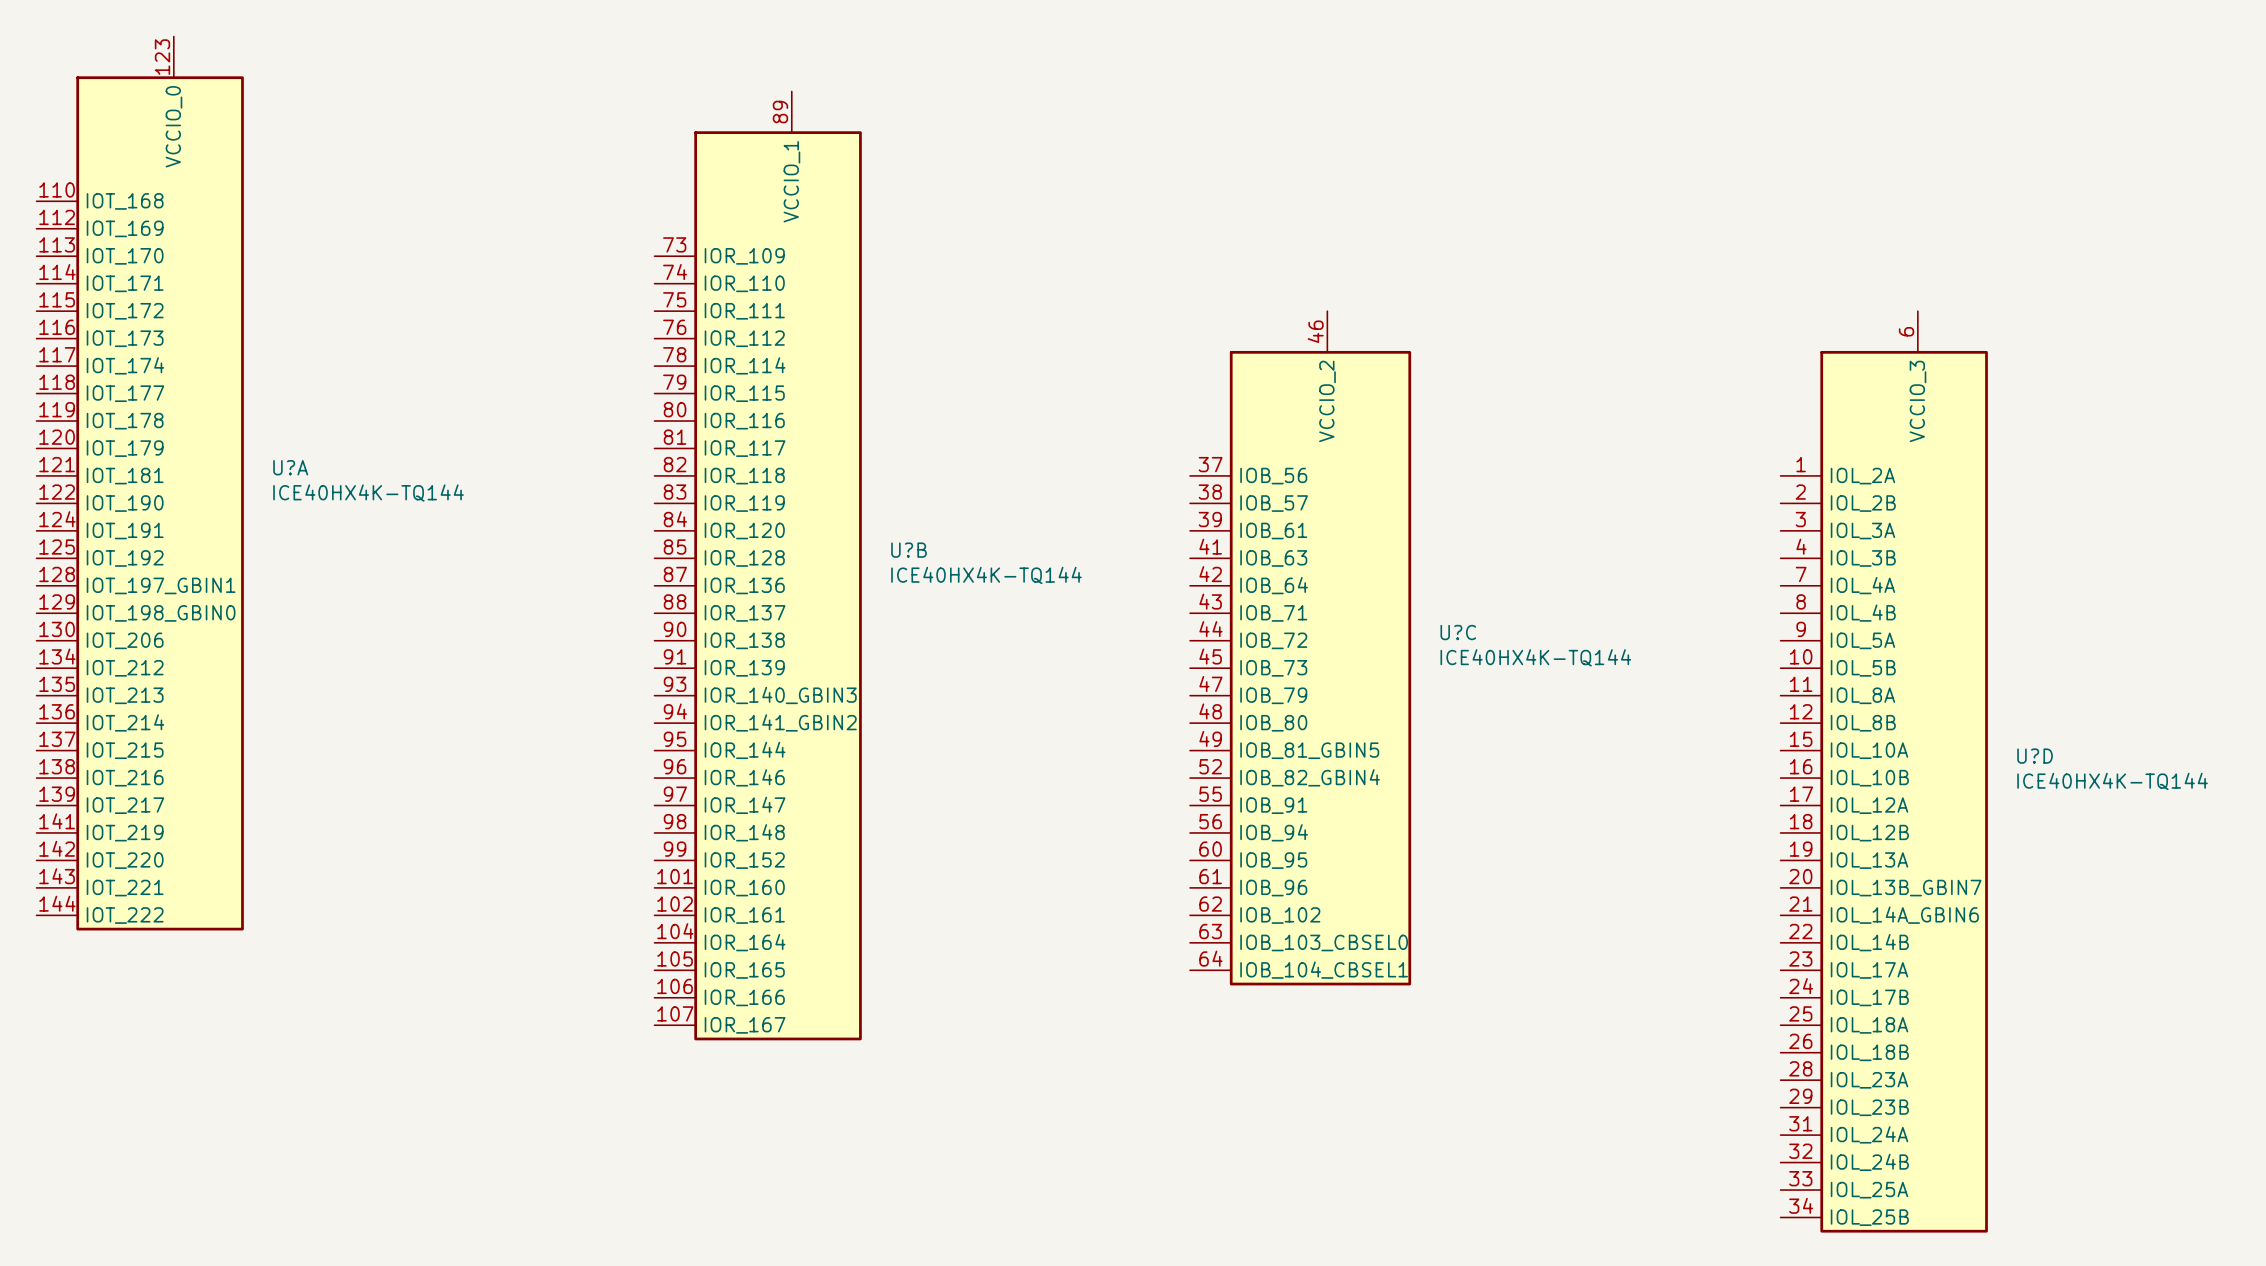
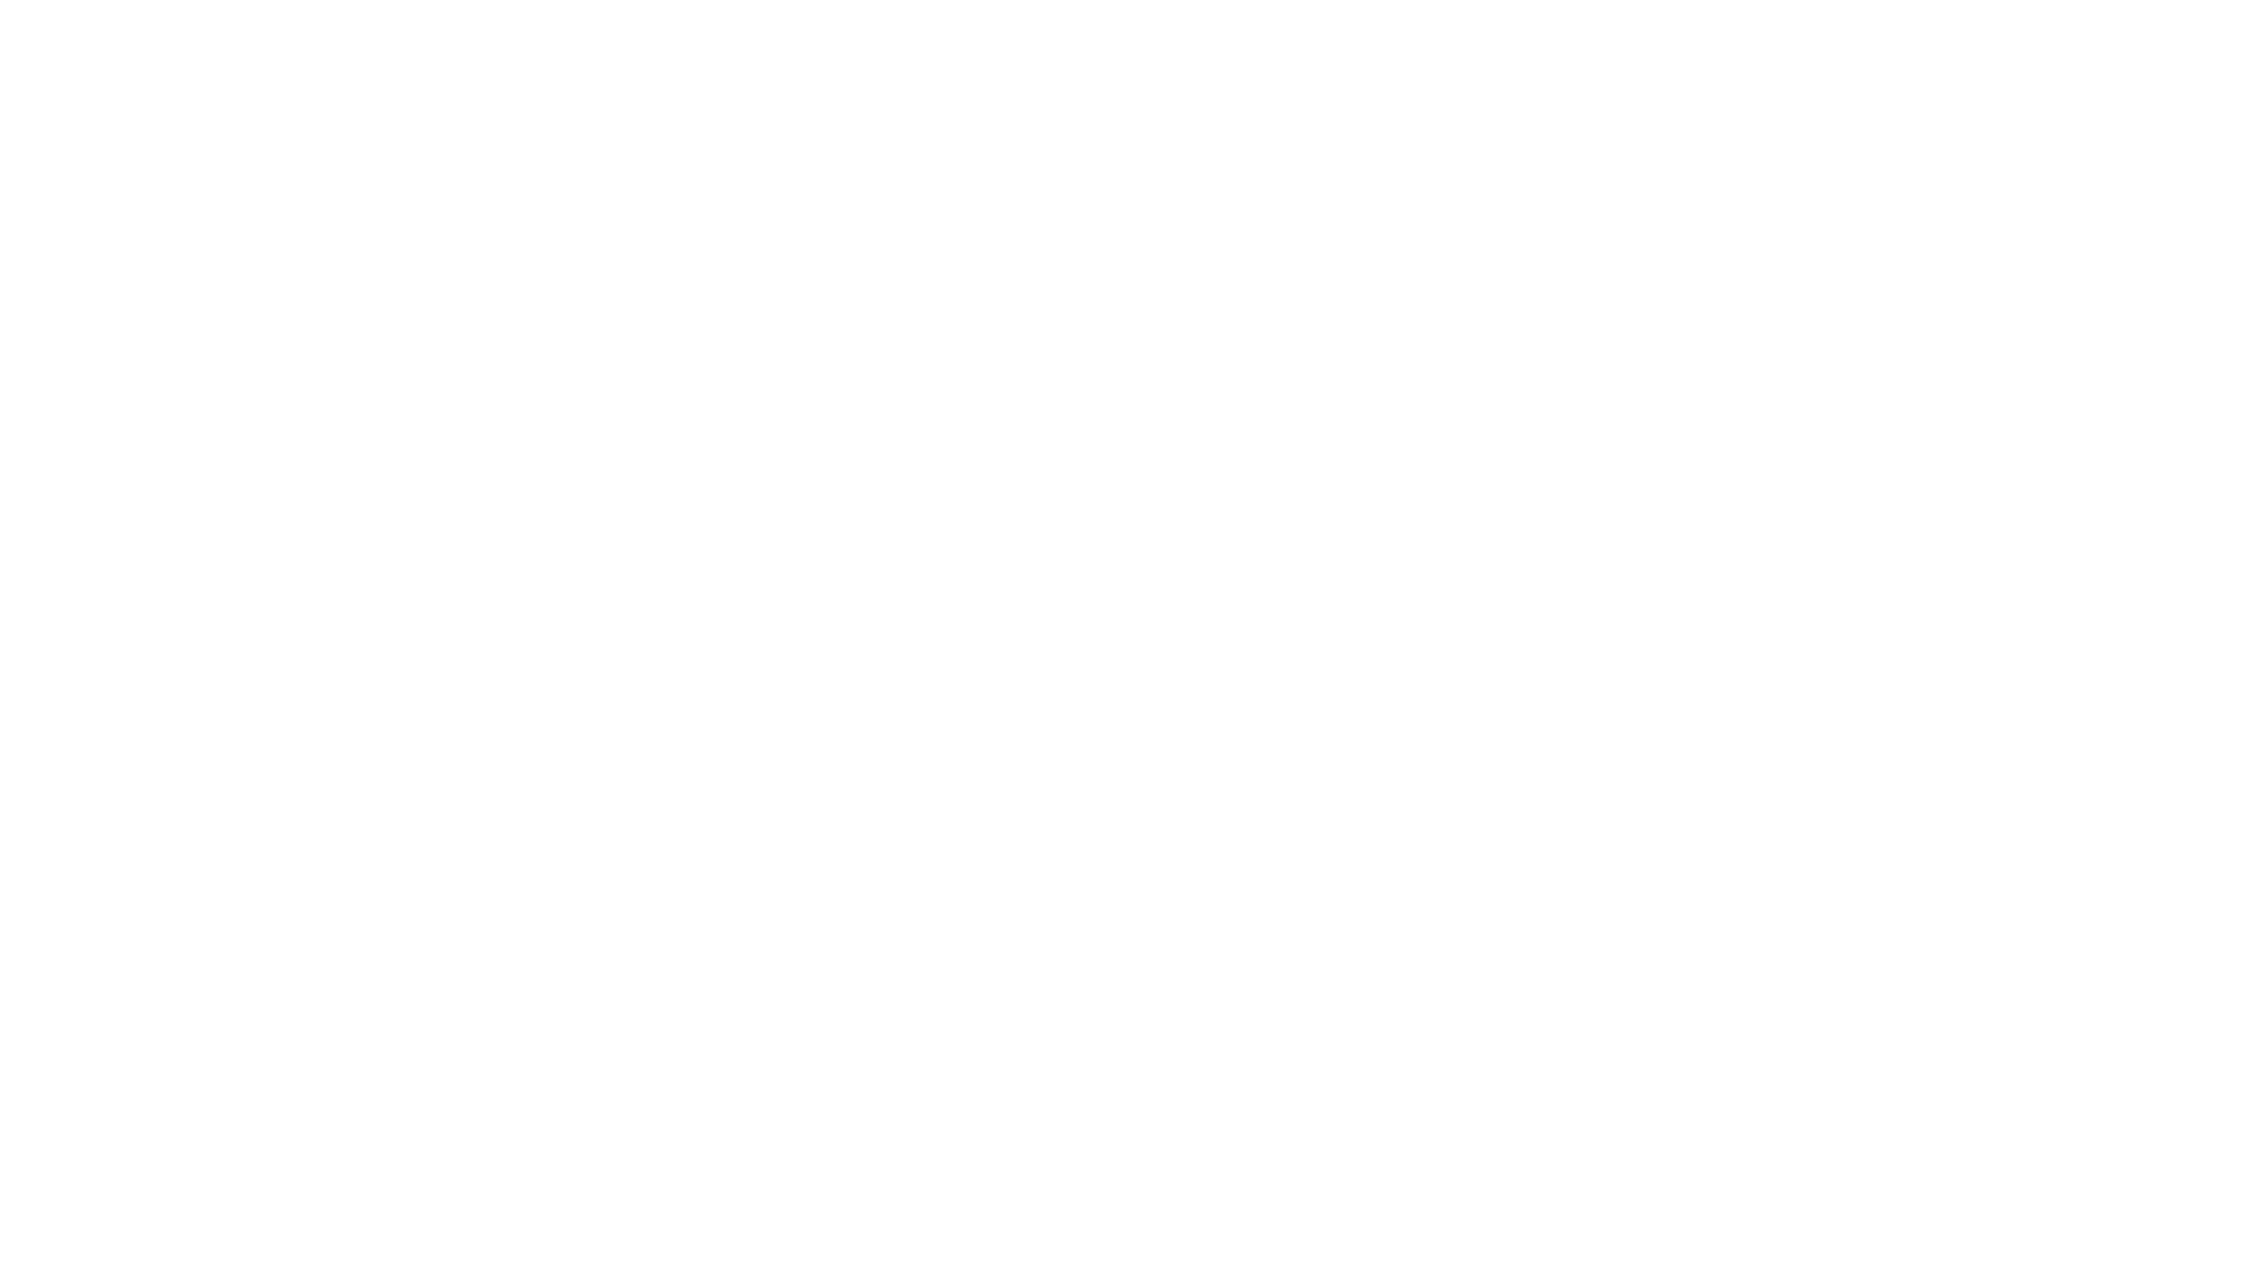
U?A: ICE40HX4K-TQ144 (140, 483) -> none
U?B: ICE40HX4K-TQ144 (758, 565) -> none
U?C: ICE40HX4K-TQ144 (1300, 648) -> none
U?D: ICE40HX4K-TQ144 (1884, 771) -> none

